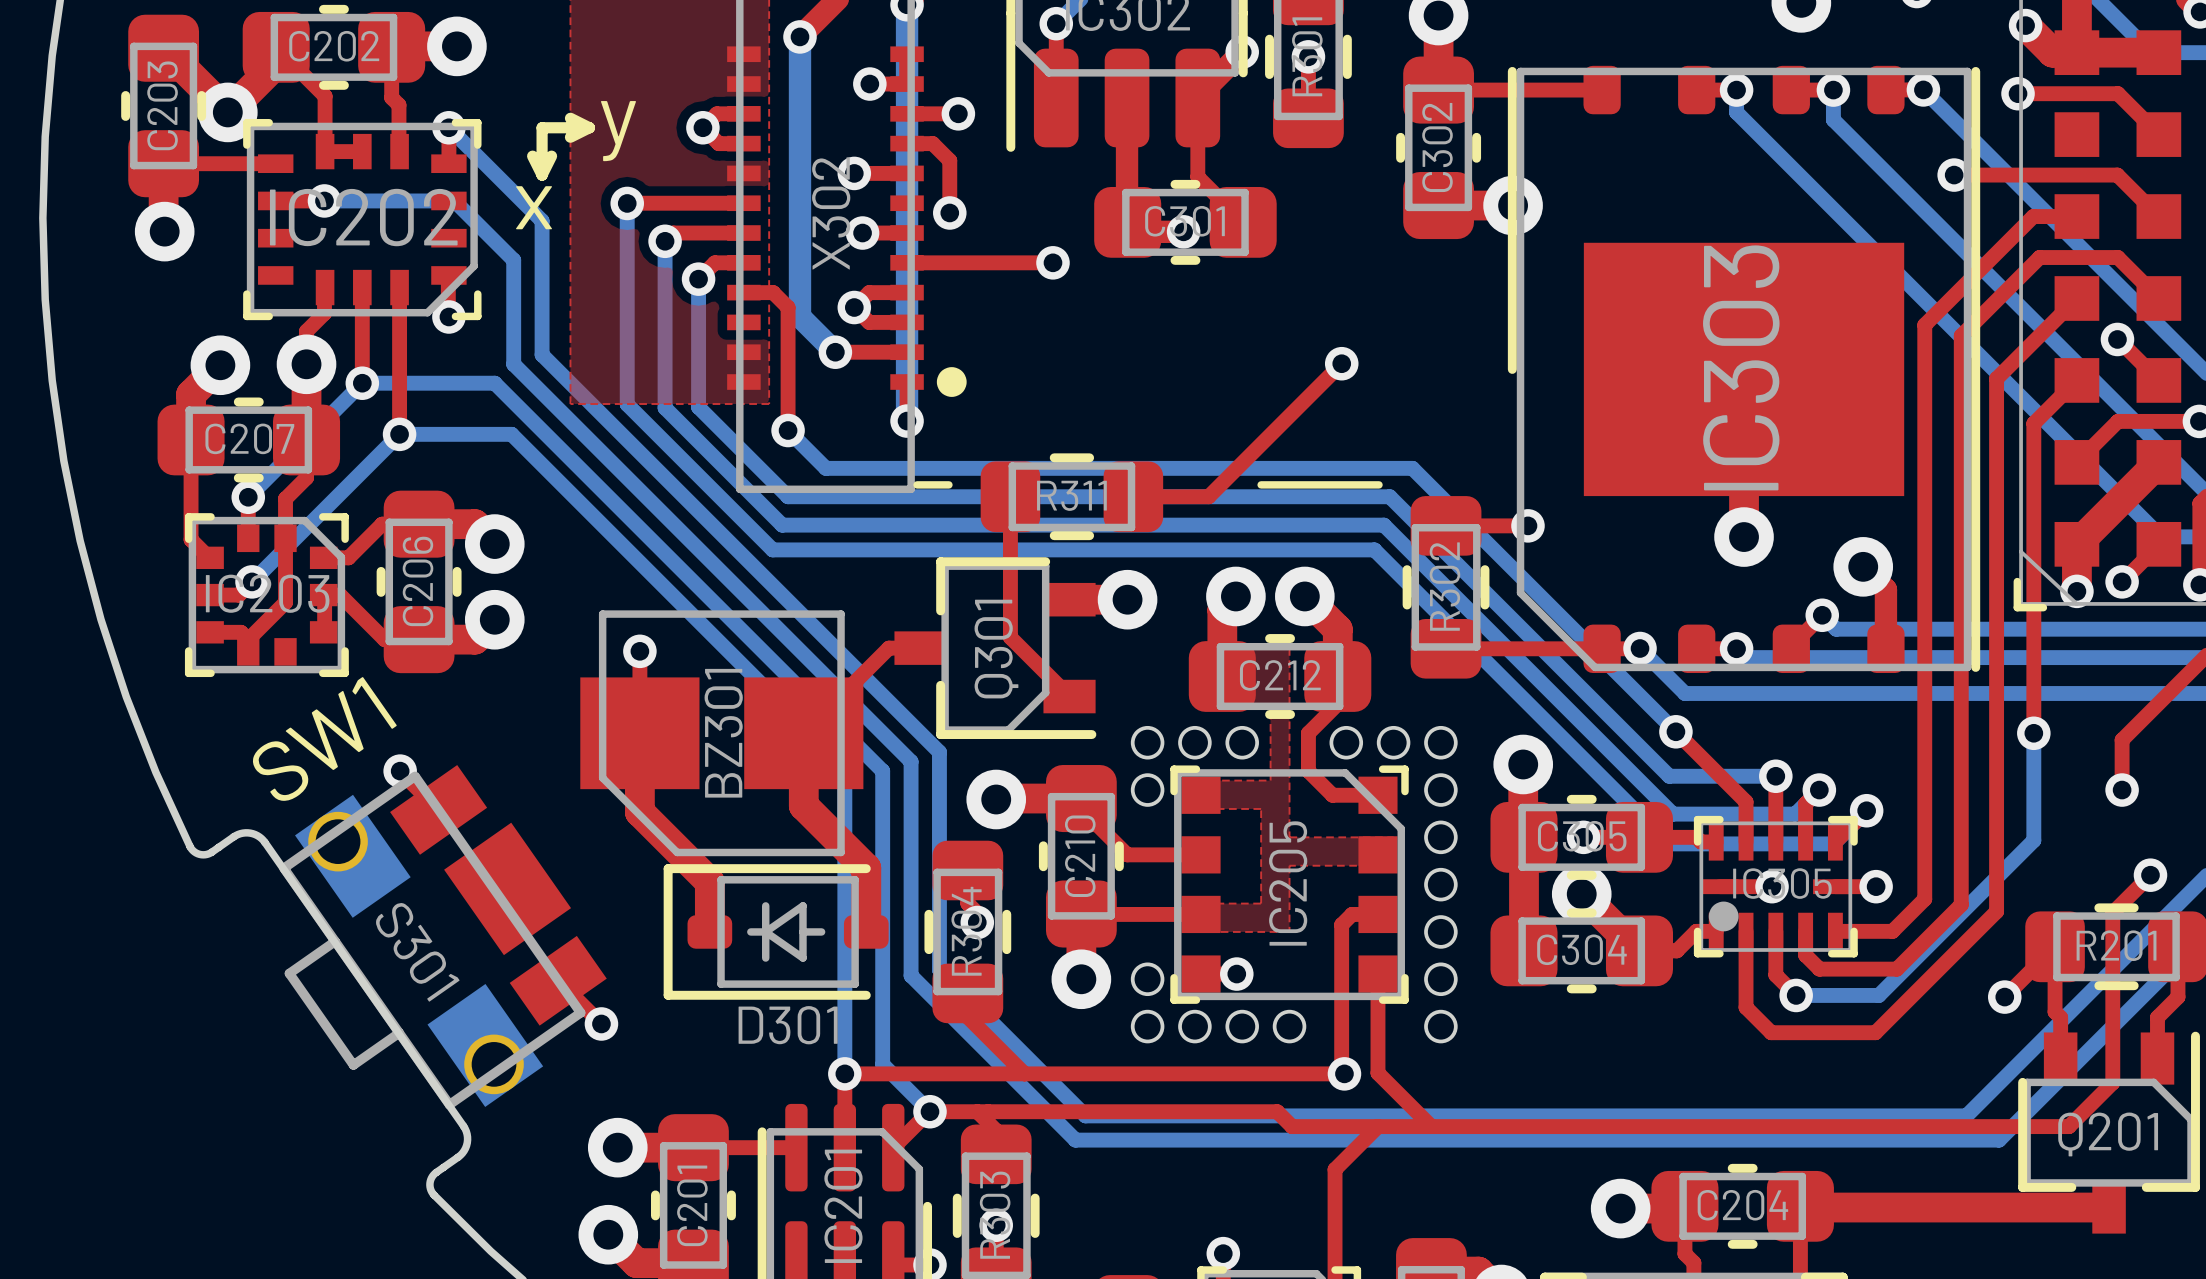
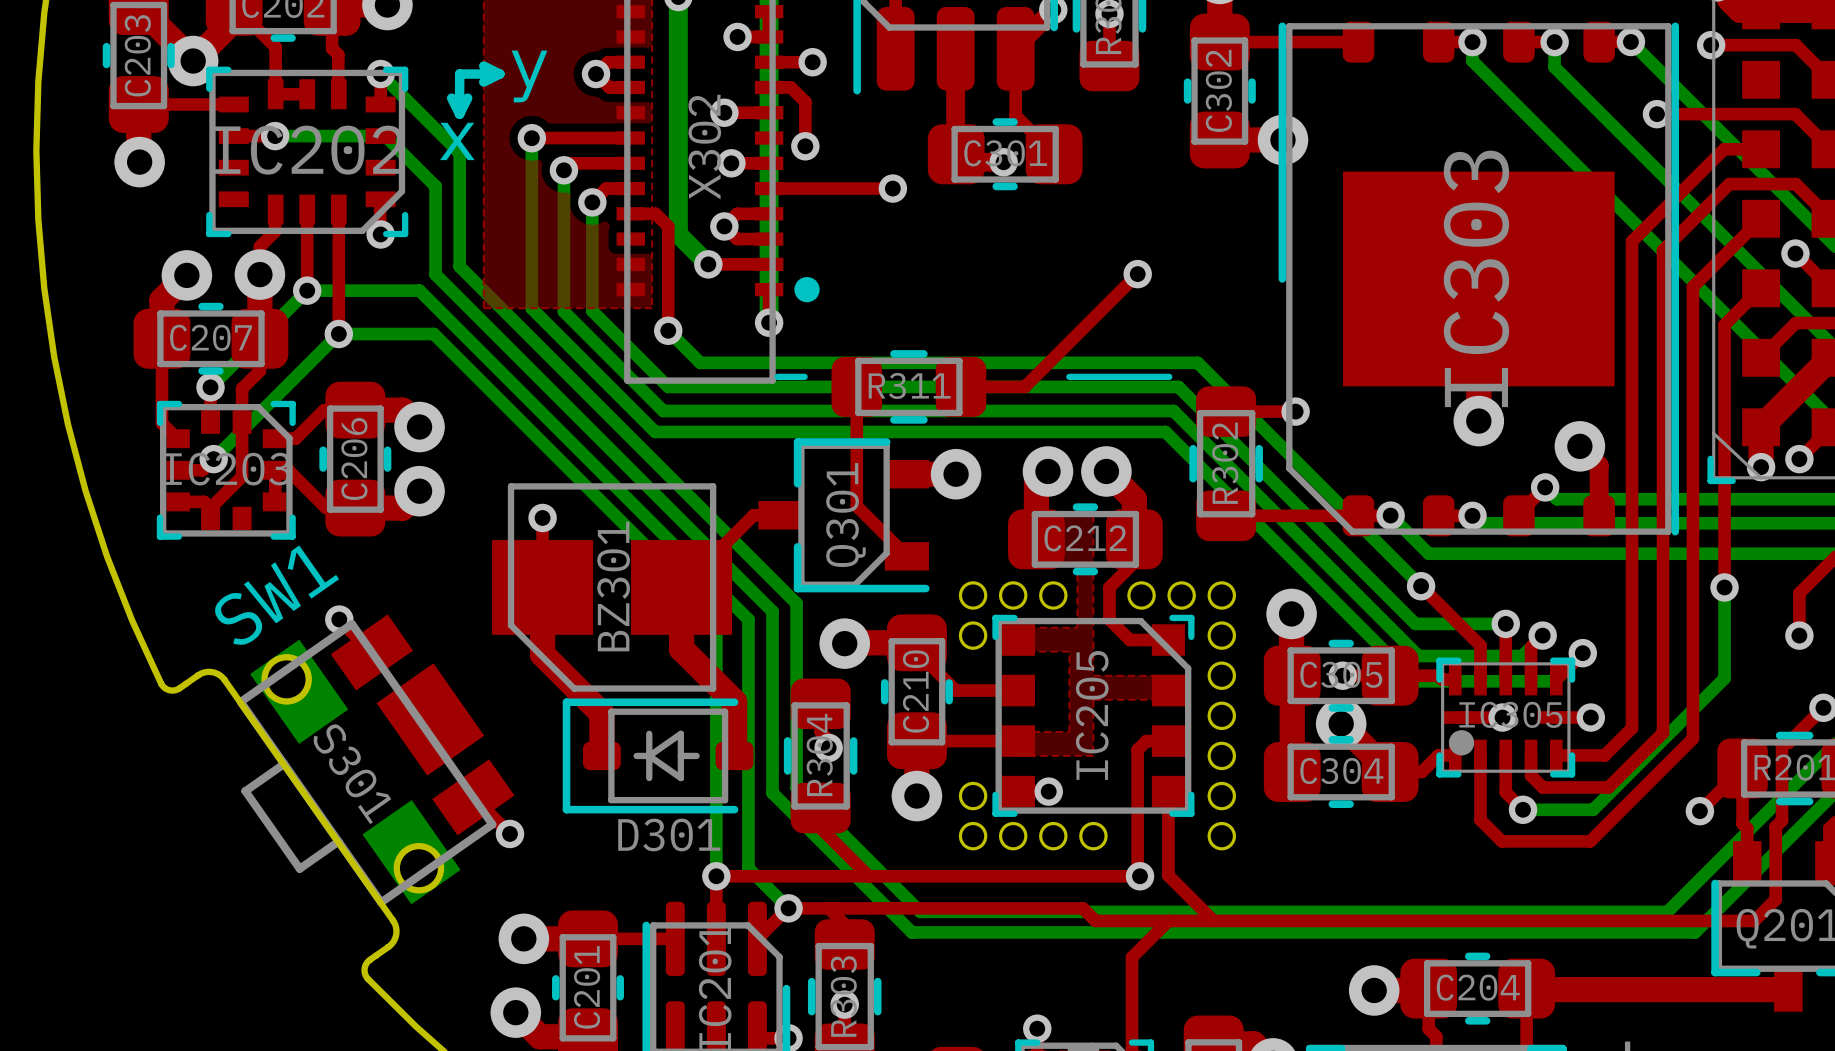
top track: (2112, 912) (2112, 1082) (2094, 1101) -> (1791, 739) (1788, 742) (1782, 742) (1782, 820) (1775, 826) (1775, 899)

